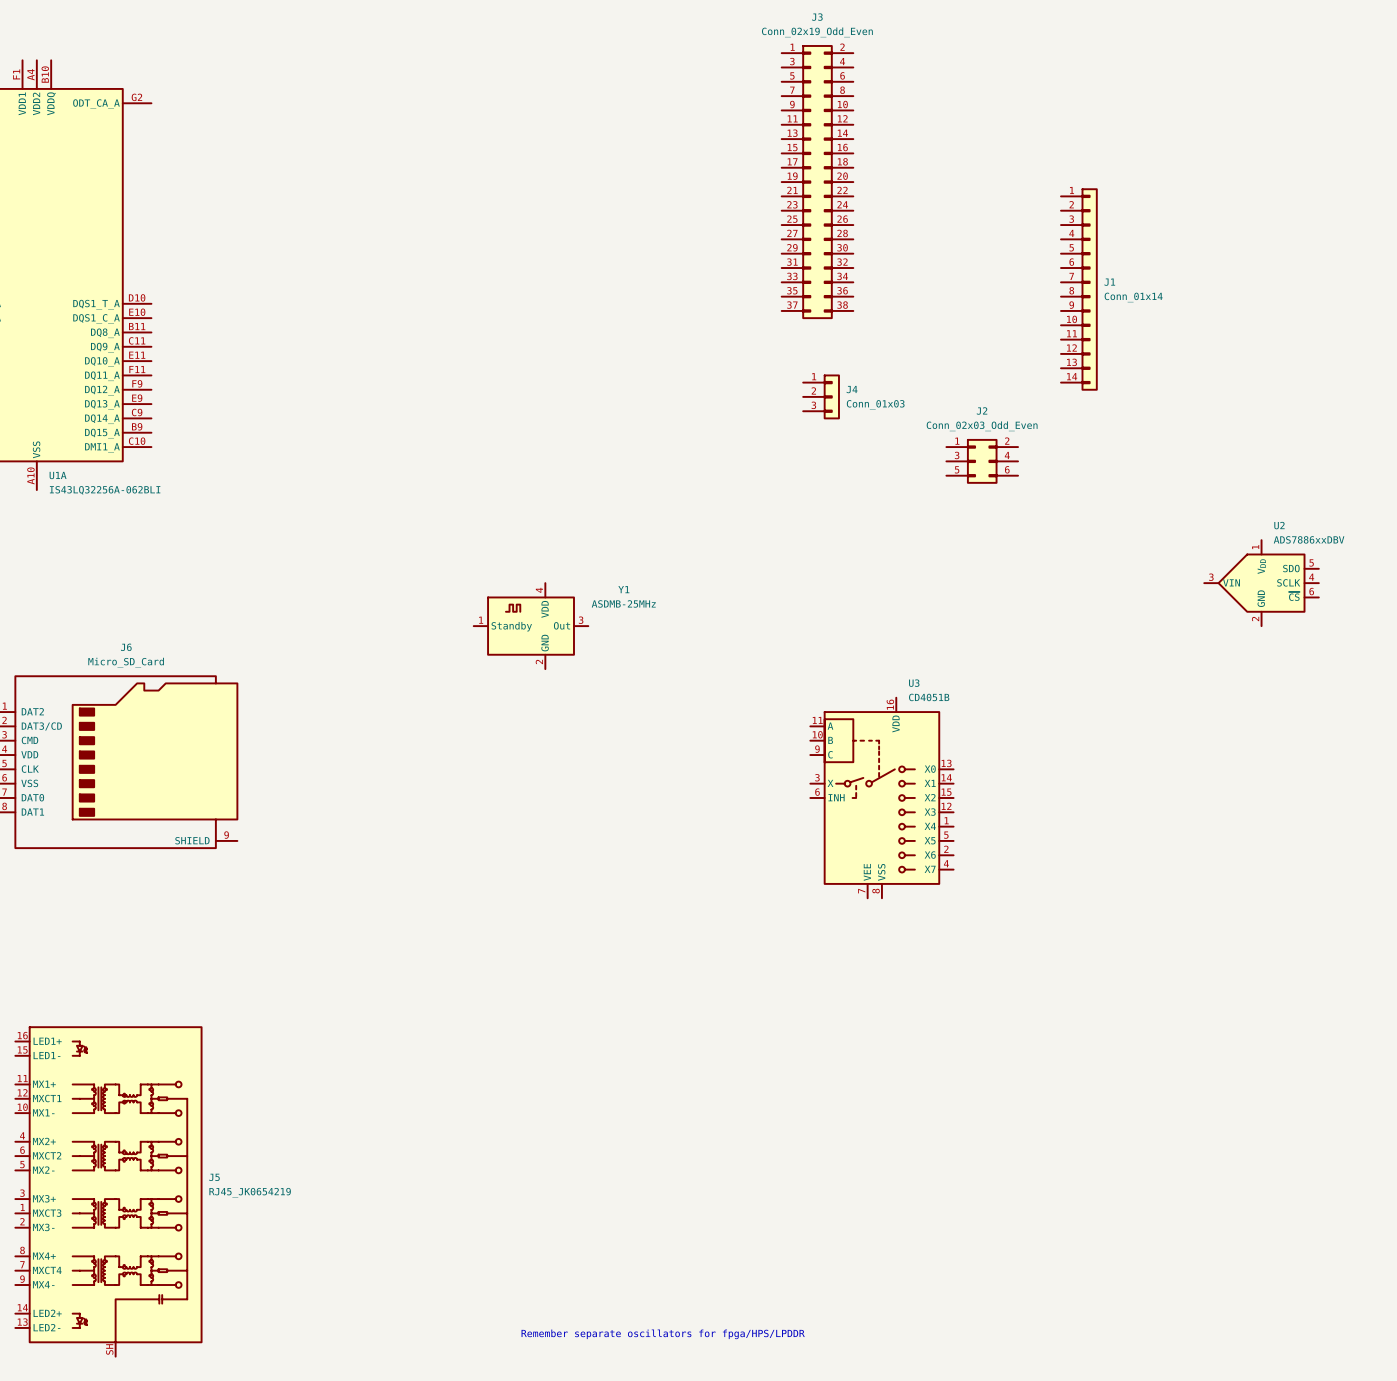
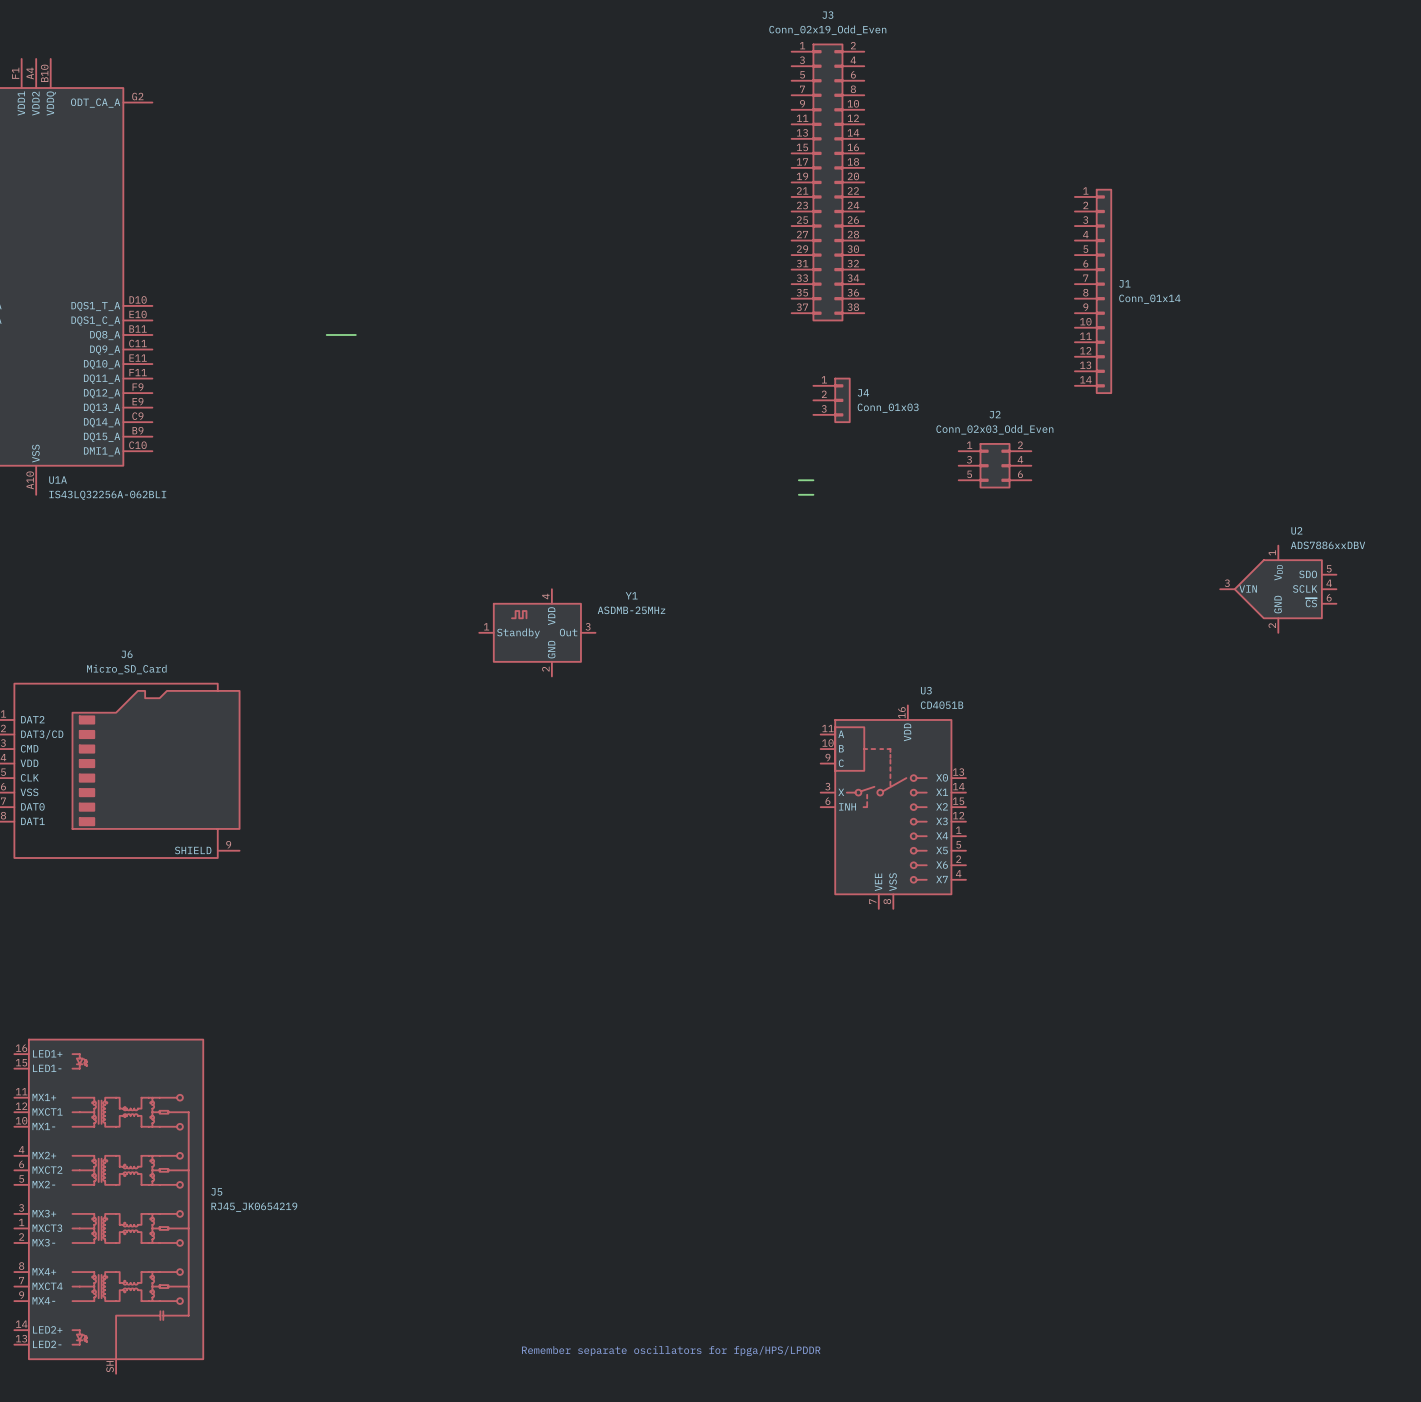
wire: none -> (326, 334) (355, 334)
wire: none -> (798, 480) (813, 480)
wire: none -> (798, 494) (813, 494)

